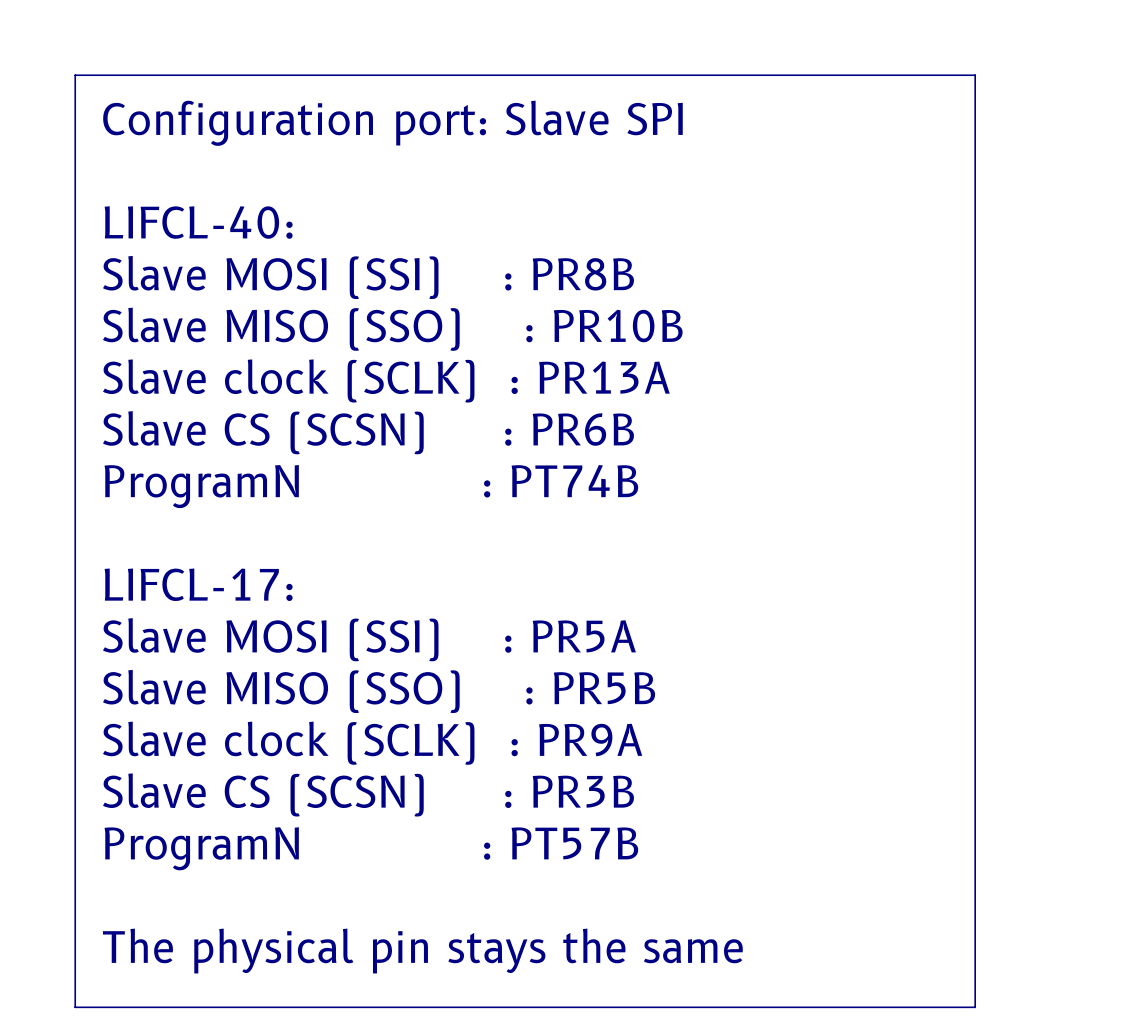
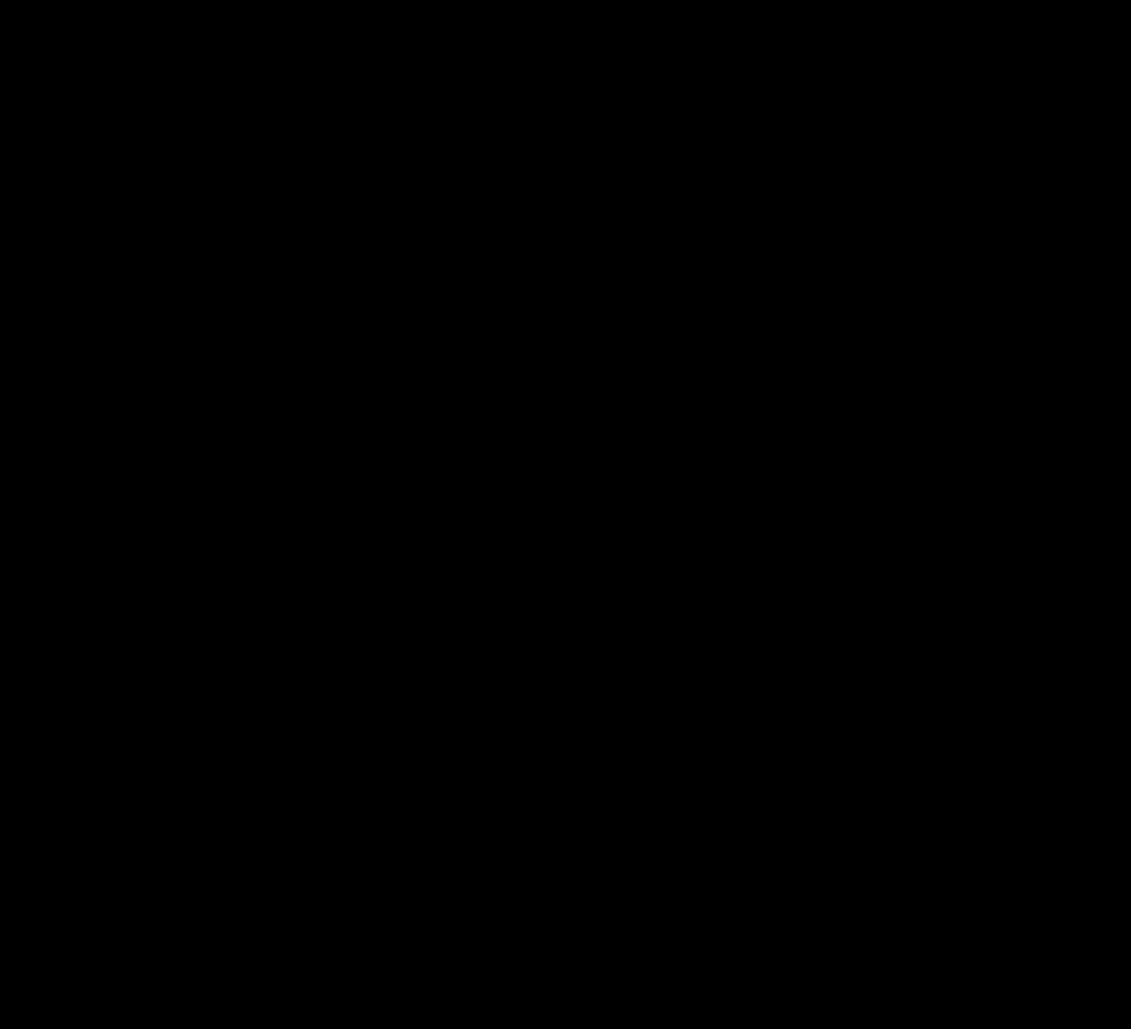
line: (75, 75) (975, 75) (975, 1007) (75, 1007) (75, 75) -> none
text: Configuration port: Slave SPI (392, 123) -> none
text: LIFCL-40: (198, 222) -> none
text: Slave MOSI (SSI) : PR8B (368, 277) -> none
text: Slave MISO (SSO) : PR10B (392, 329) -> none
text: Slave clock (SCLK) : PR13A (386, 380) -> none
text: Slave CS (SCSN) : PR6B (368, 432) -> none
text: ProgramN : PT74B (371, 486) -> none
text: LIFCL-17: (198, 584) -> none
text: Slave MOSI (SSI) : PR5A (369, 639) -> none
text: Slave MISO (SSO) : PR5B (379, 691) -> none
text: Slave clock (SCLK) : PR9A (372, 743) -> none
text: Slave CS (SCSN) : PR3B (368, 794) -> none
text: ProgramN : PT57B (371, 848) -> none
text: The physical pin stays the same (422, 951) -> none

